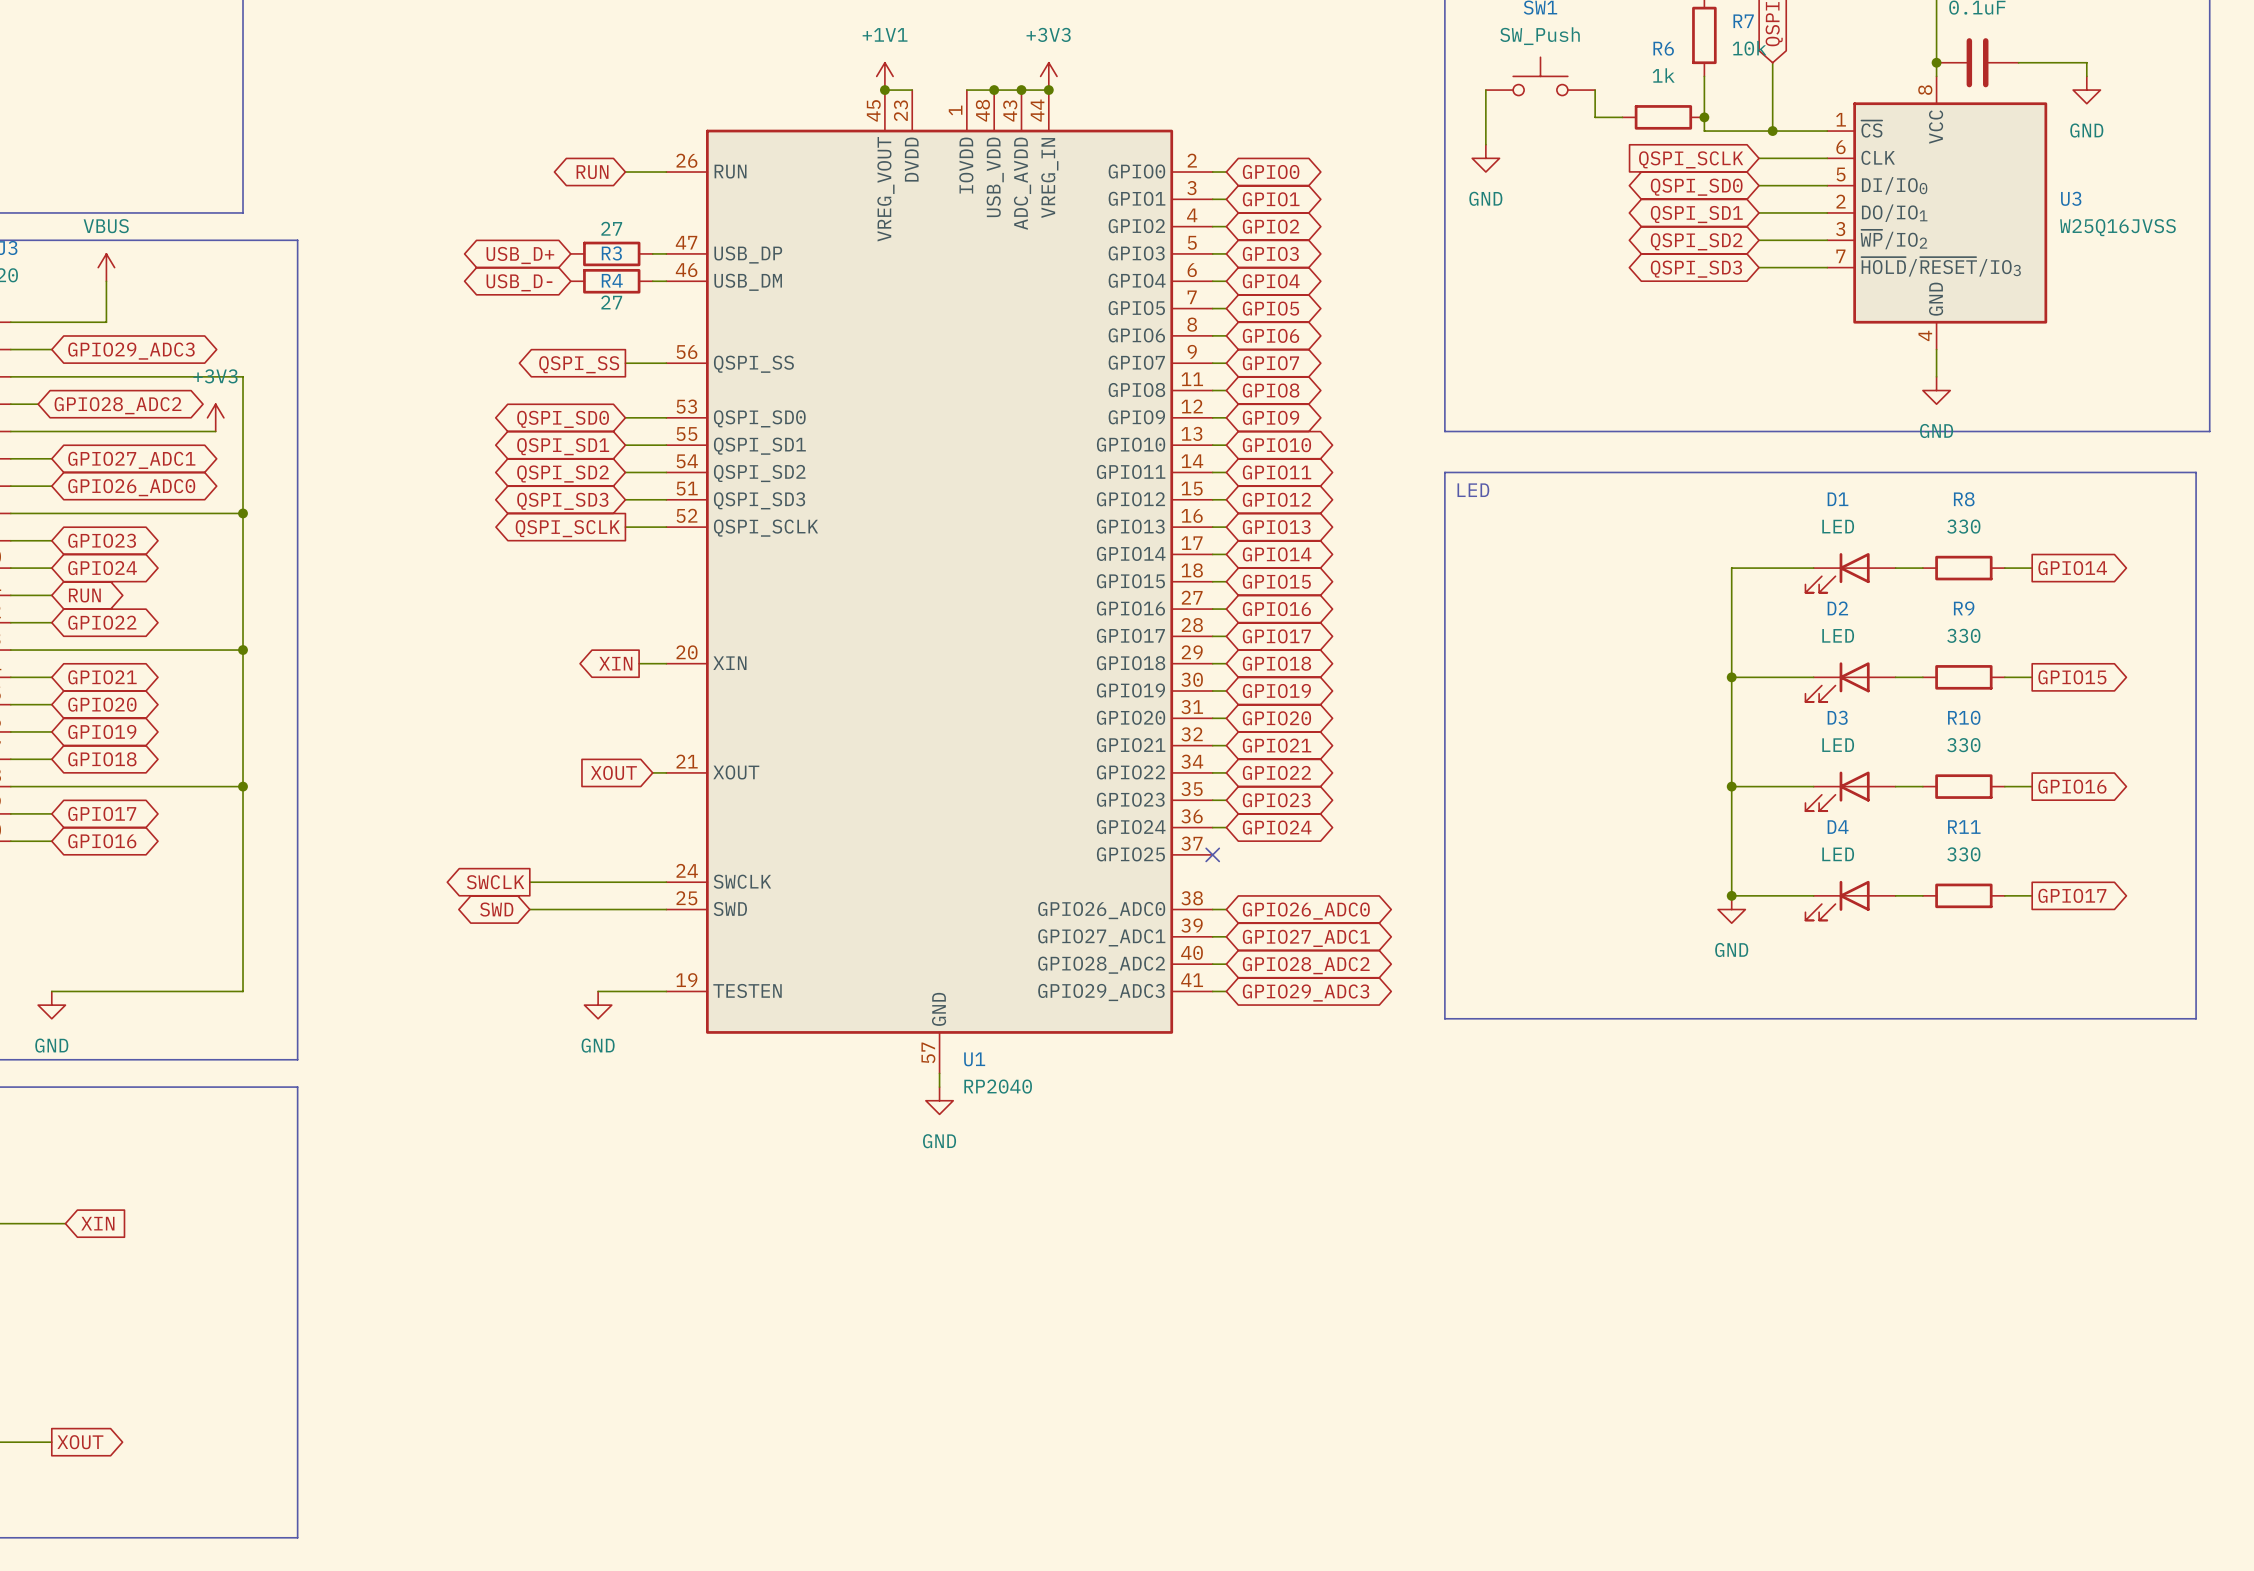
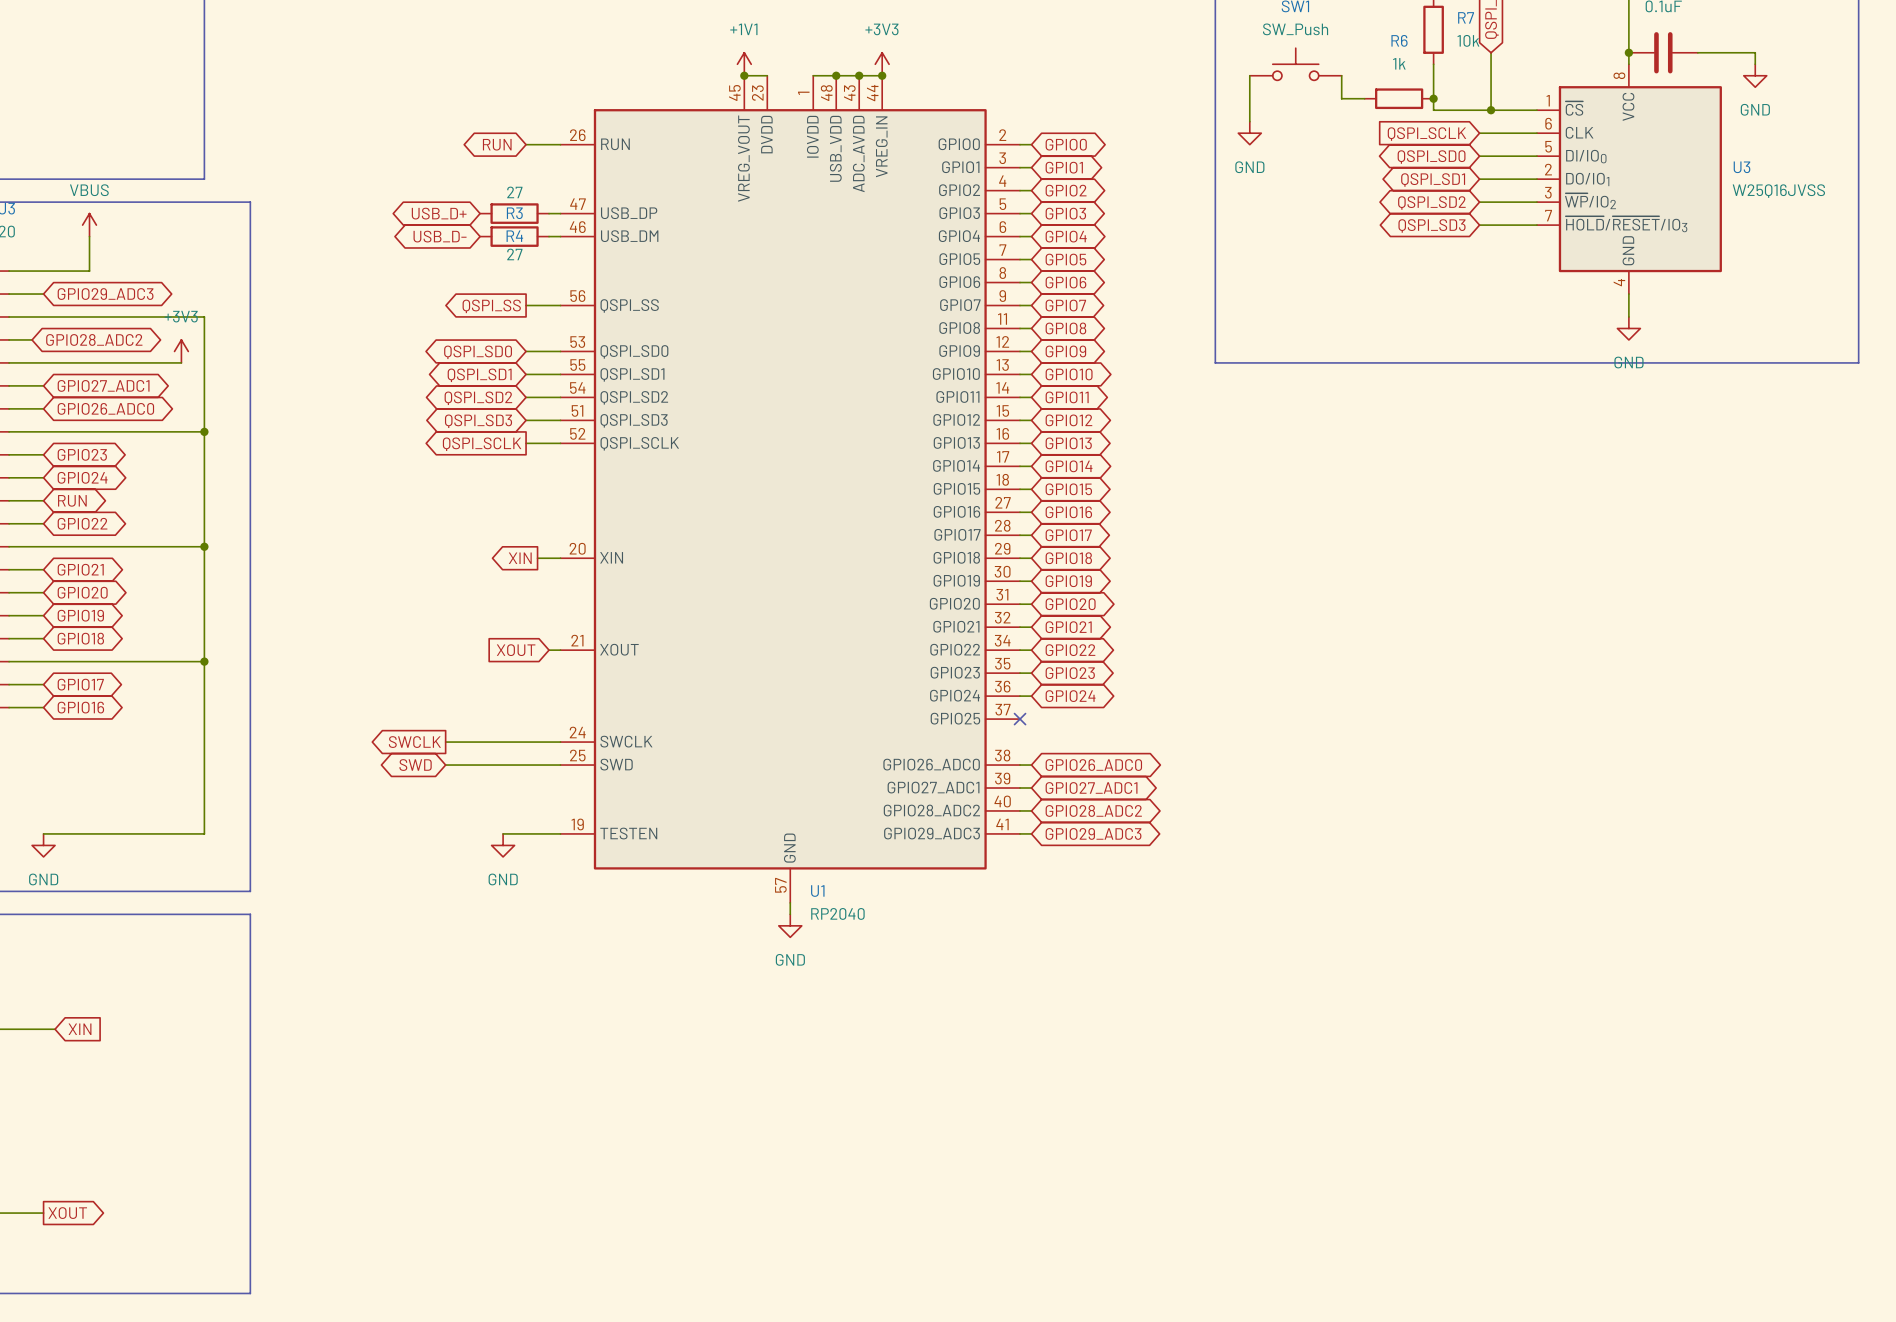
line: (1444, 472) (2196, 472) (2196, 1018) (1444, 1018) (1444, 472) -> none
text: LED (1473, 490) -> none
wire: (1813, 568) (1731, 568) (1731, 895) (1813, 895) -> none
wire: (1895, 568) (1922, 568) -> none
R8: 330 (1963, 568) -> none
wire: (2004, 568) (2032, 568) -> none
global label: GPIO14 (2072, 568) -> none
D1: LED (1850, 572) -> none
wire: (1731, 677) (1813, 677) -> none
junction: (1731, 677) -> none
wire: (1895, 677) (1922, 677) -> none
R9: 330 (1963, 677) -> none
wire: (2004, 677) (2032, 677) -> none
global label: GPIO15 (2072, 677) -> none
D2: LED (1850, 682) -> none
wire: (1731, 786) (1813, 786) -> none
junction: (1731, 786) -> none
wire: (1895, 786) (1922, 786) -> none
R10: 330 (1963, 786) -> none
wire: (2004, 786) (2032, 786) -> none
global label: GPIO16 (2072, 786) -> none
D3: LED (1850, 791) -> none
junction: (1731, 895) -> none
wire: (1895, 895) (1922, 895) -> none
R11: 330 (1963, 895) -> none
wire: (2004, 895) (2032, 895) -> none
global label: GPIO17 (2072, 895) -> none
D4: LED (1850, 900) -> none
power symbol: GND (1731, 909) -> none

